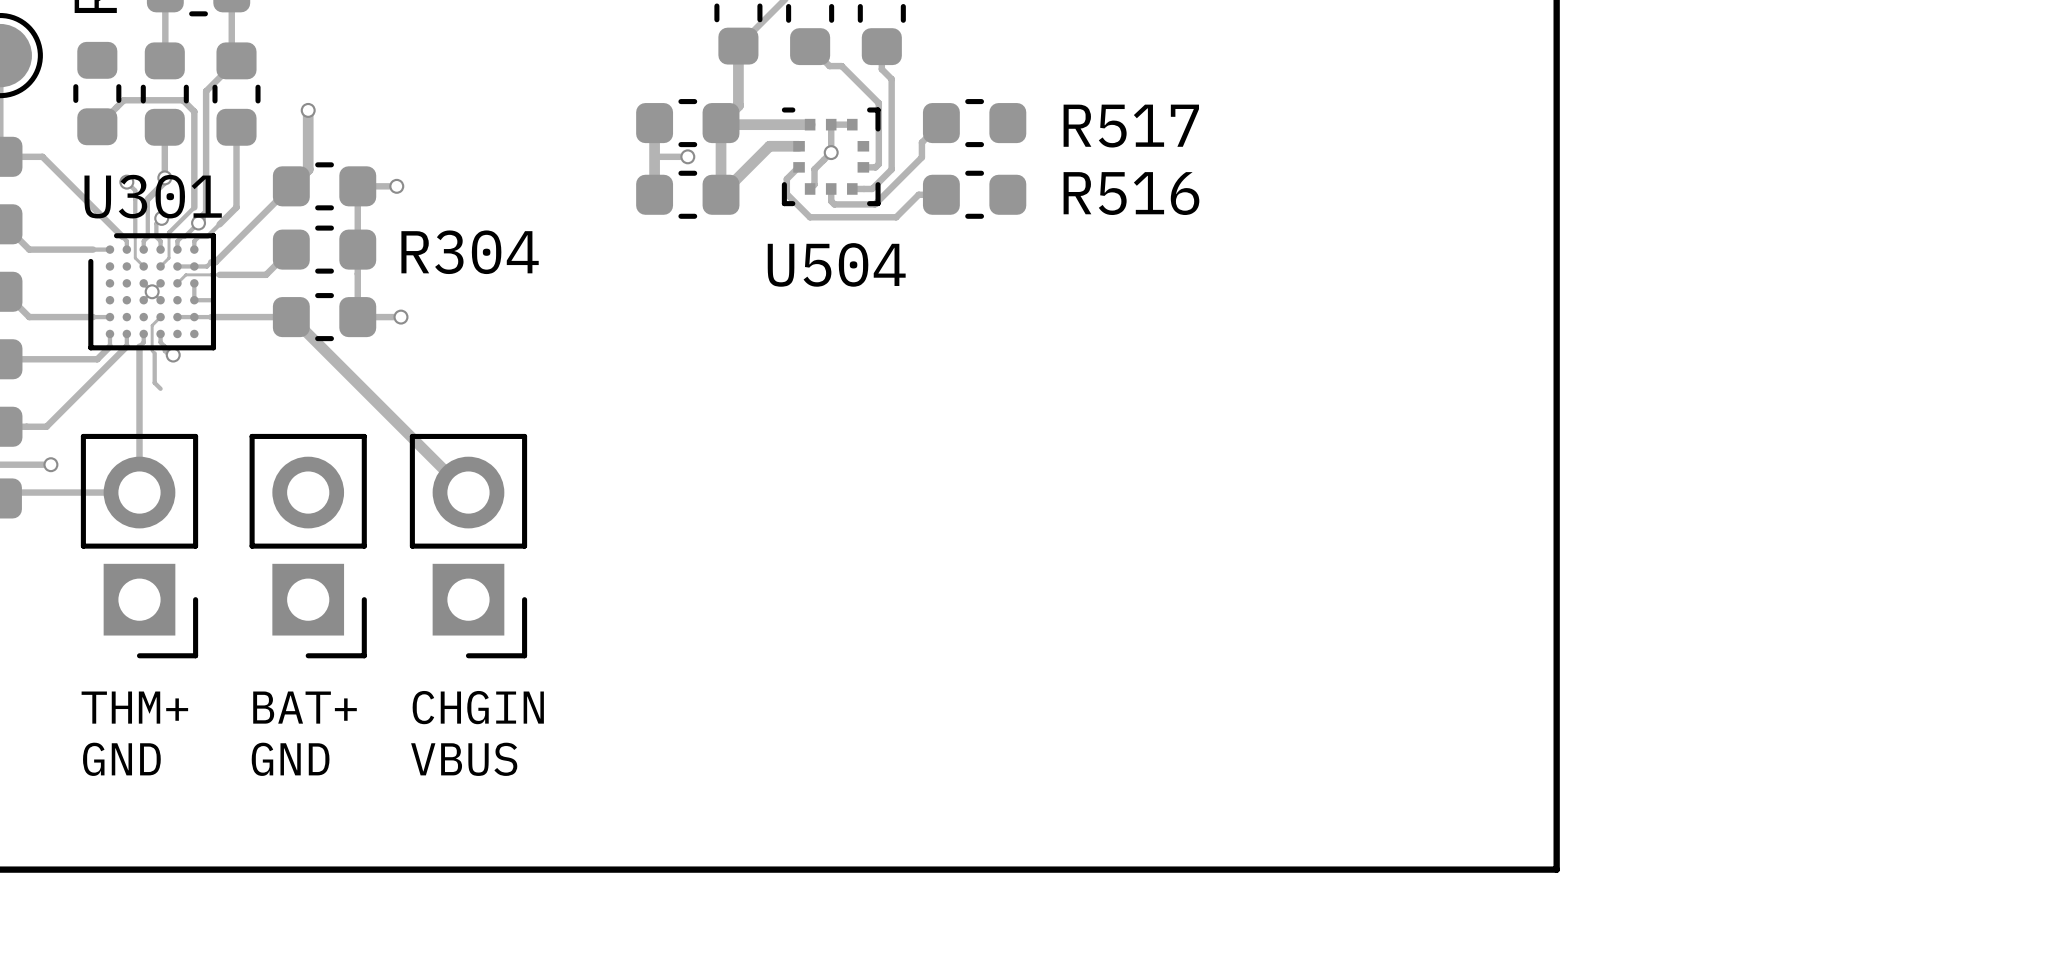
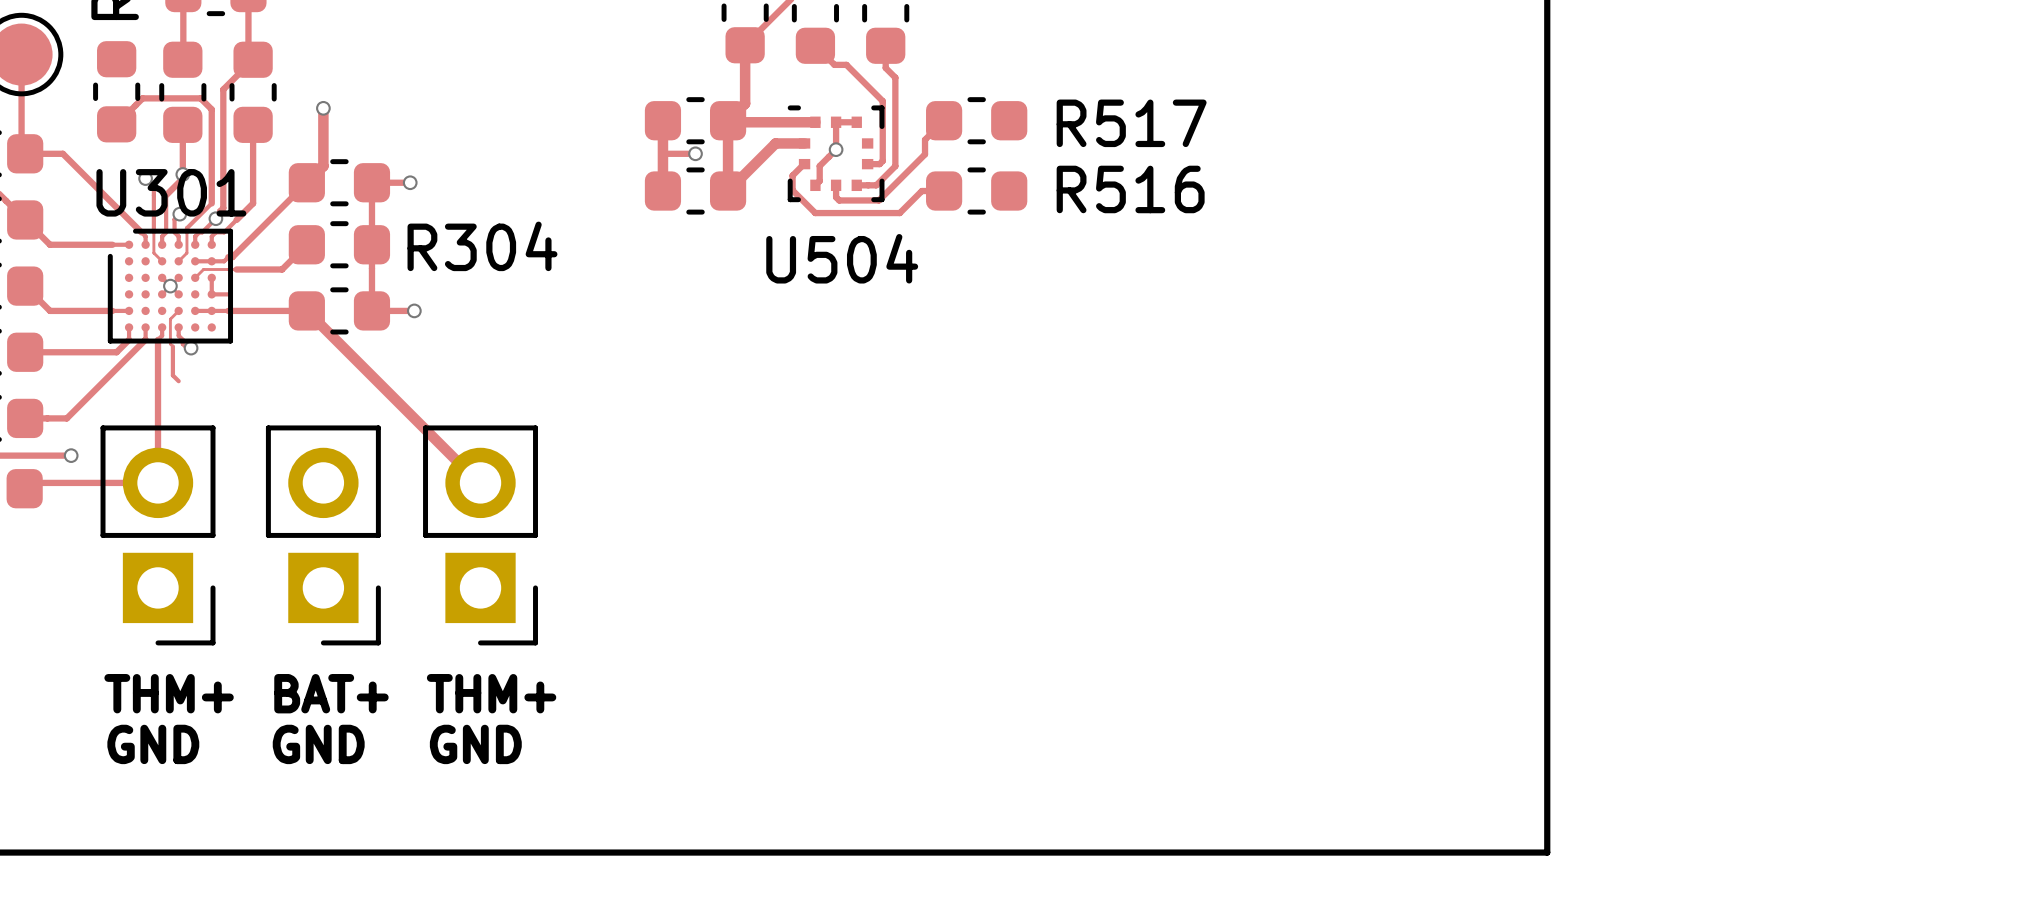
text: CHGIN (478, 707) -> THM+ (491, 693)
text: VBUS (464, 759) -> GND (475, 744)

